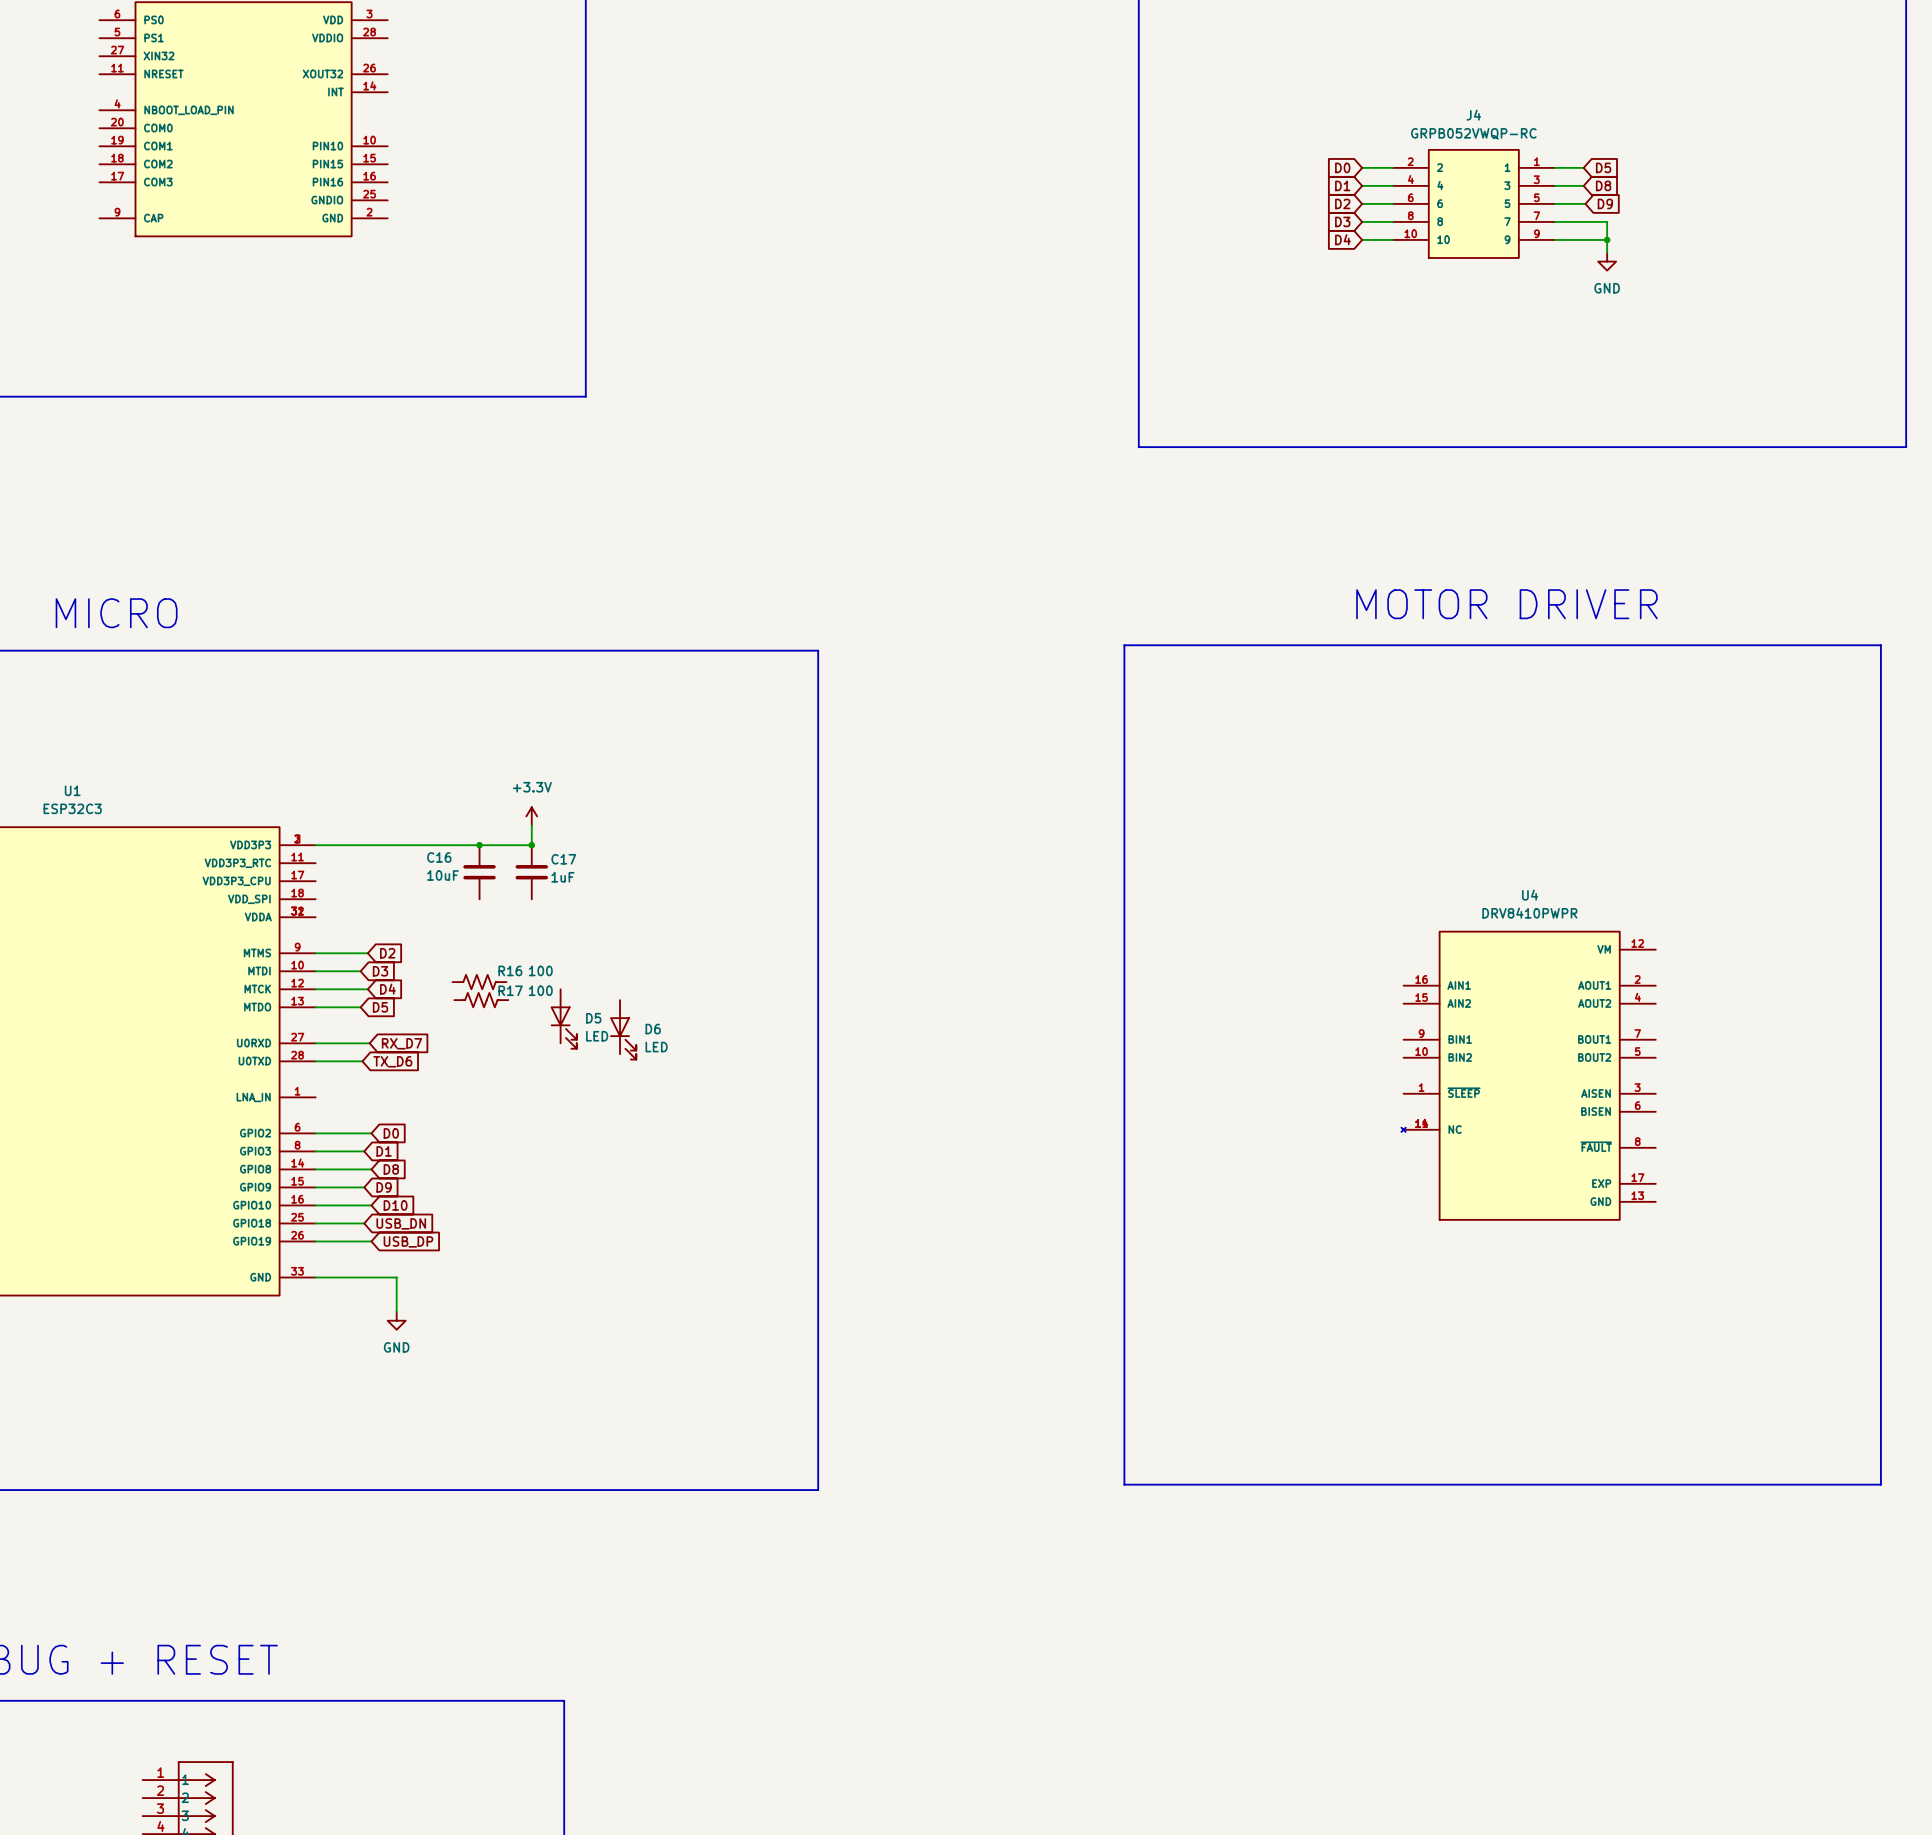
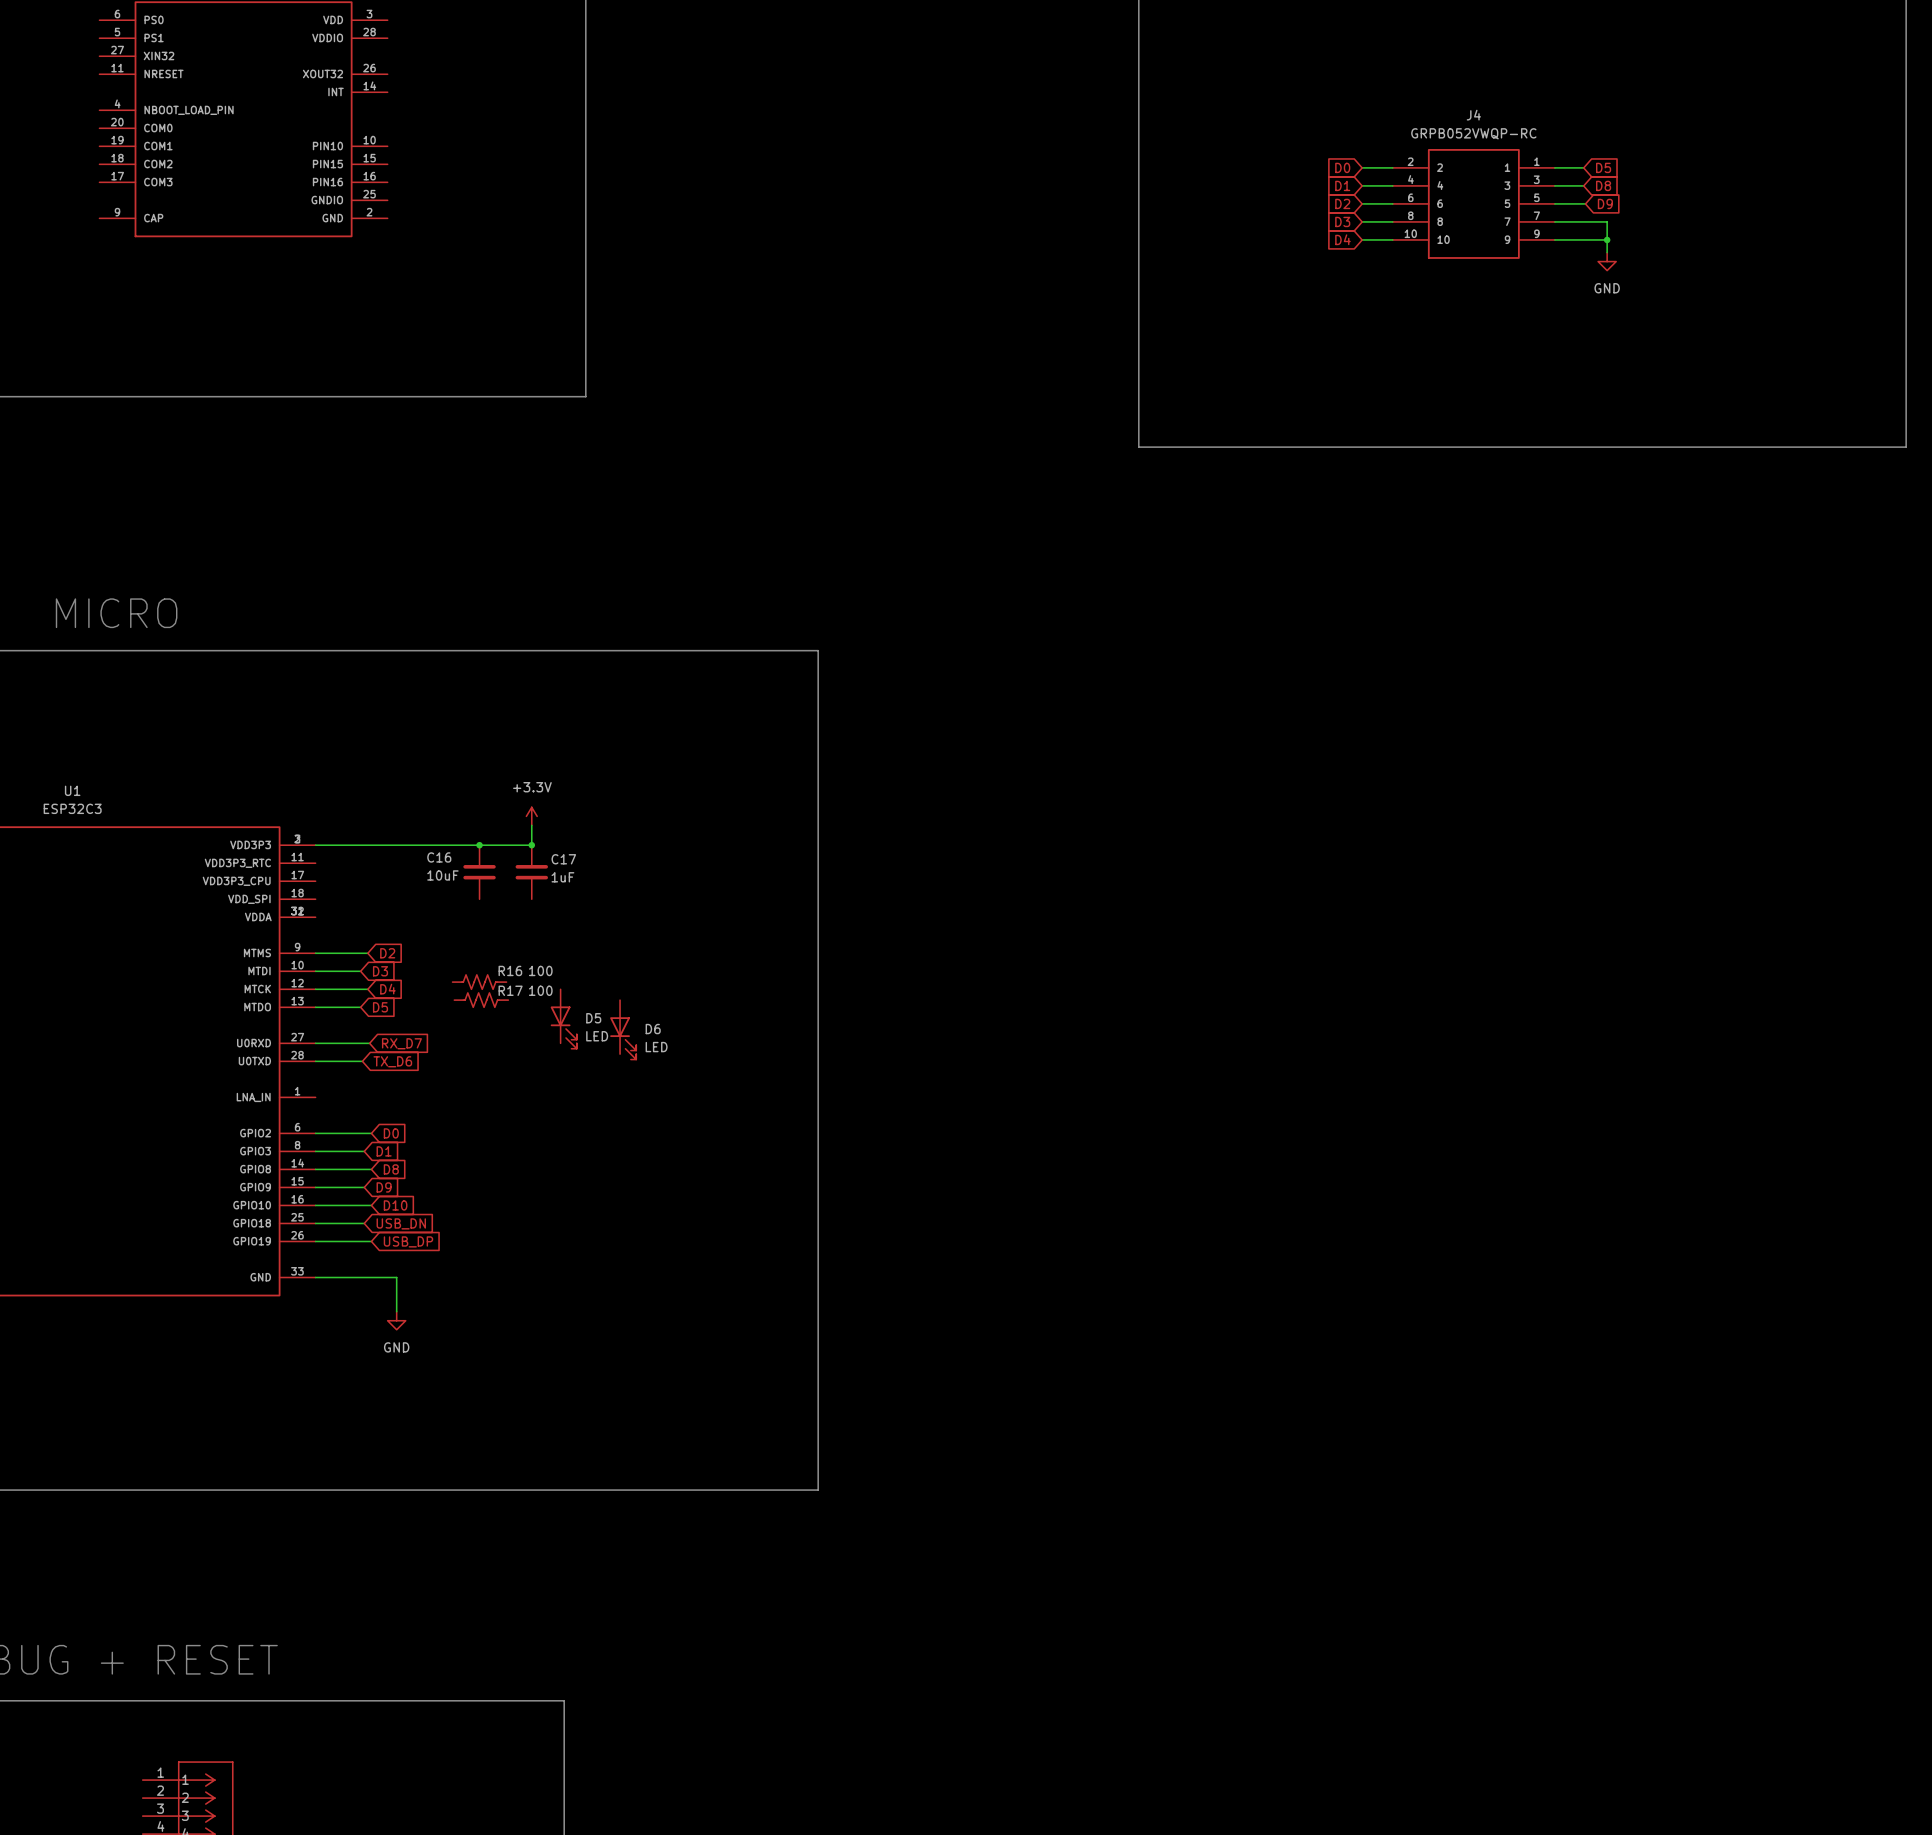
text: MOTOR DRIVER (1506, 604) -> none
line: (1124, 645) (1880, 645) (1880, 1484) (1124, 1484) (1124, 645) -> none
U4: DRV8410PWPR (1528, 1075) -> none

